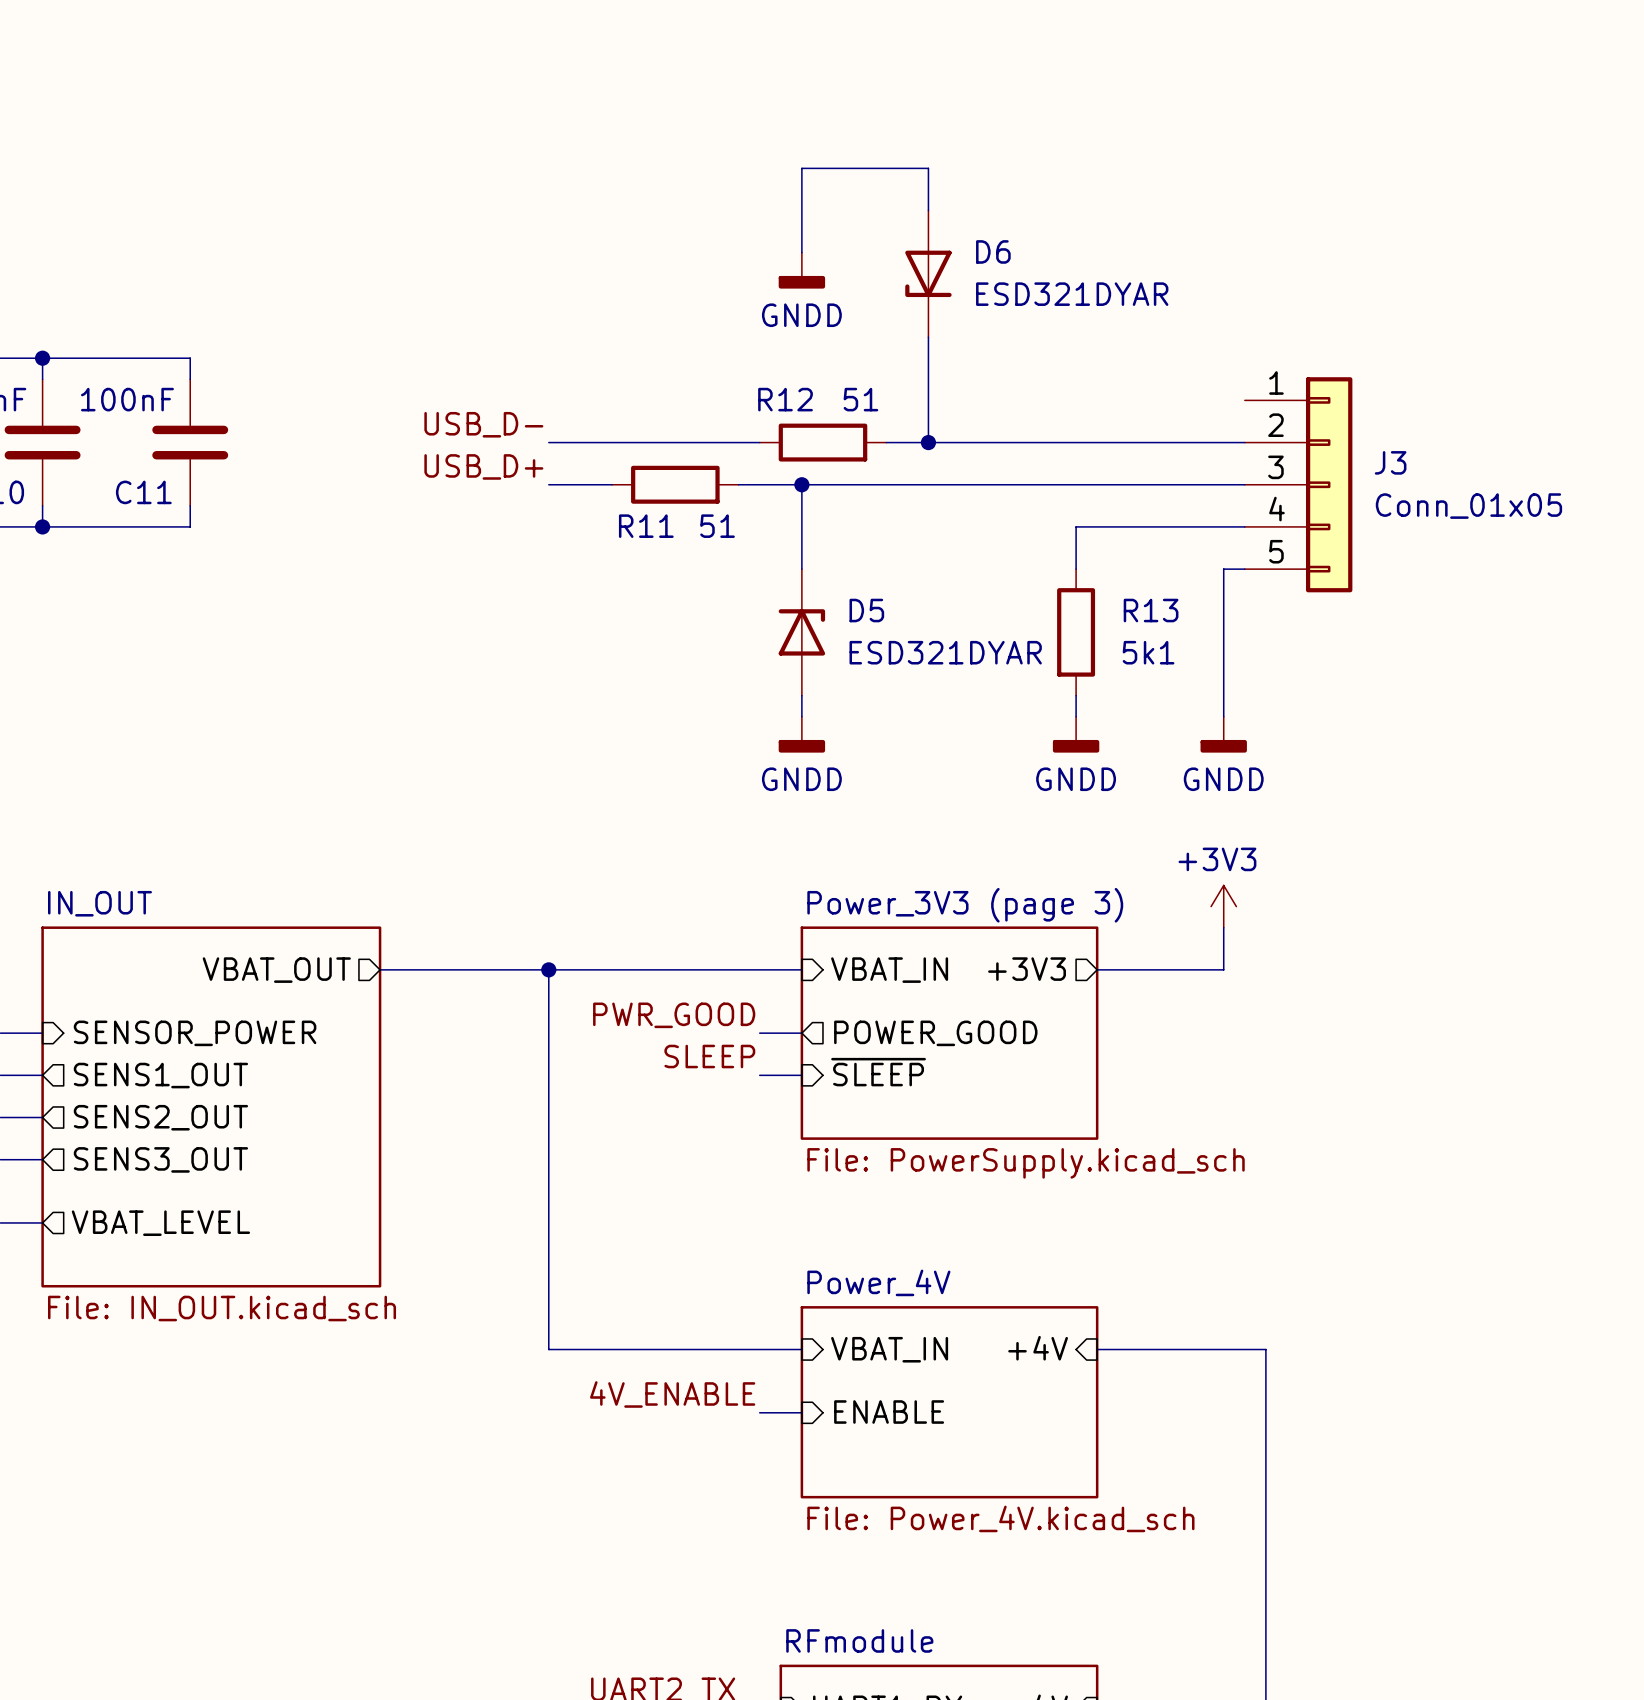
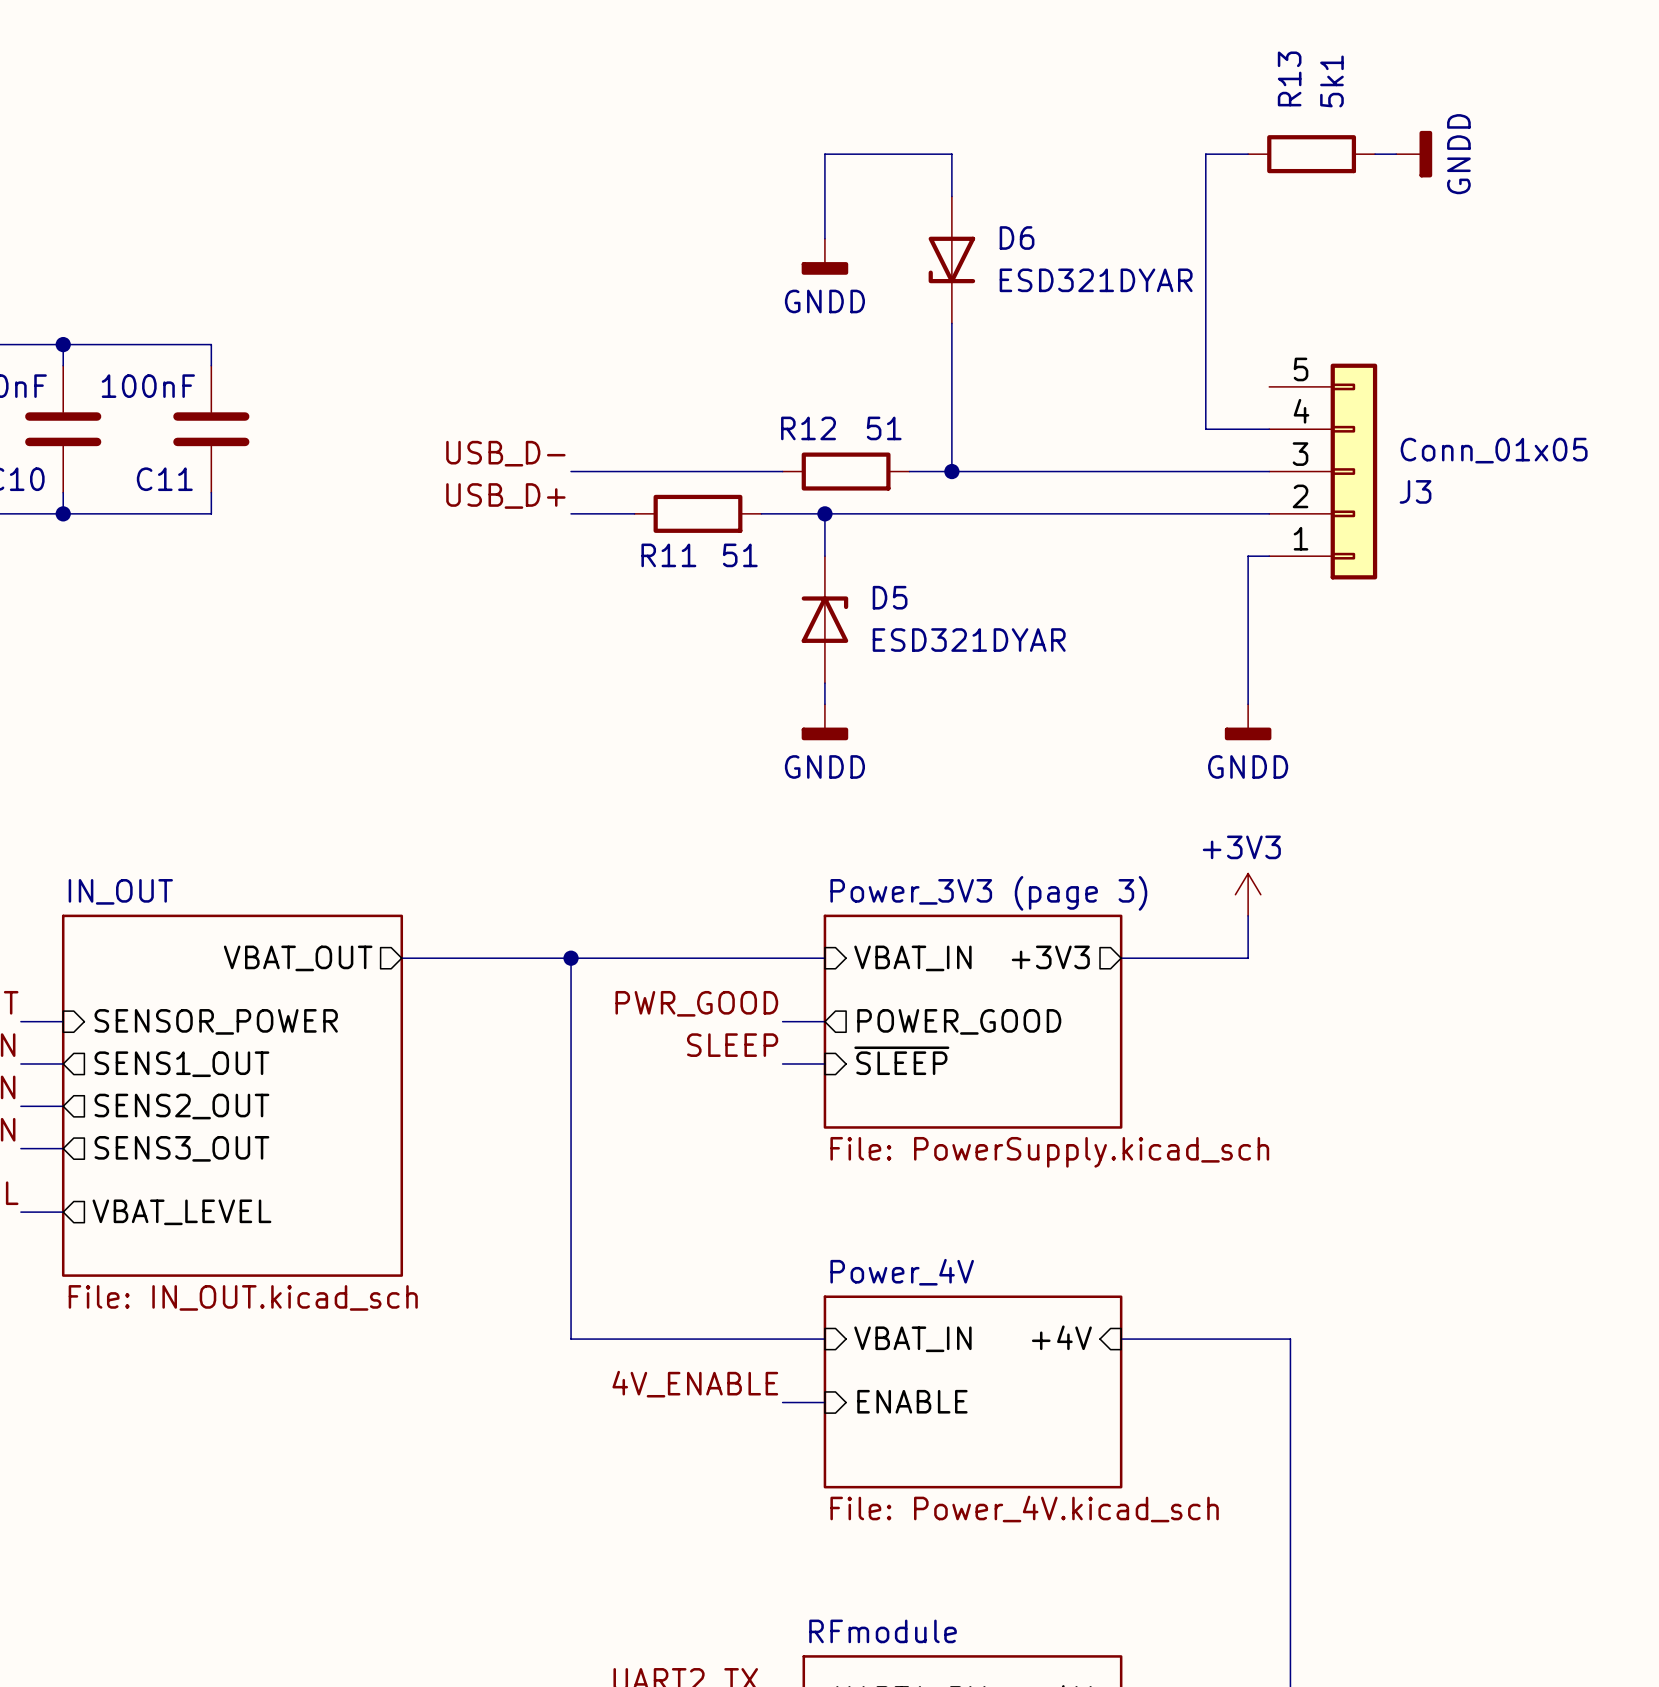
wire: none -> (1375, 154) (1396, 154)
power symbol: none -> GNDD (1414, 154)
label: USB_D- (483, 424) -> none
wire: (548, 442) (759, 442) -> none
R12 position: (822, 442) -> (846, 471)
wire: (886, 442) (1181, 442) -> (1248, 154) (1205, 154) (1205, 429)
junction position: (928, 442) -> (951, 471)
label: USB_D+ (483, 466) -> USB_D- (505, 453)
R11 position: (675, 484) -> (697, 513)
wire: (759, 484) (886, 484) -> (634, 471) (761, 471)
wire: (801, 484) (801, 526) -> (951, 429) (951, 471)
junction position: (801, 484) -> (824, 513)
J3 flip: as is (1329, 484) -> up-down (1353, 471)
label: none -> USB_D+ (505, 495)
wire: none -> (571, 513) (634, 513)
wire: (1076, 526) (1076, 569) -> (1100, 513) (761, 513)
R13 name position: R13 (1151, 610) -> R13 (1289, 78)
R13 rotation: 0° (1076, 632) -> 90° clockwise (1311, 154)
R13 position: (1076, 632) -> (1311, 154)
R13 value position: 5k1 (1148, 652) -> 5k1 (1331, 81)
wire: (1076, 695) (1076, 716) -> none
power symbol: GNDD (1076, 734) -> none

